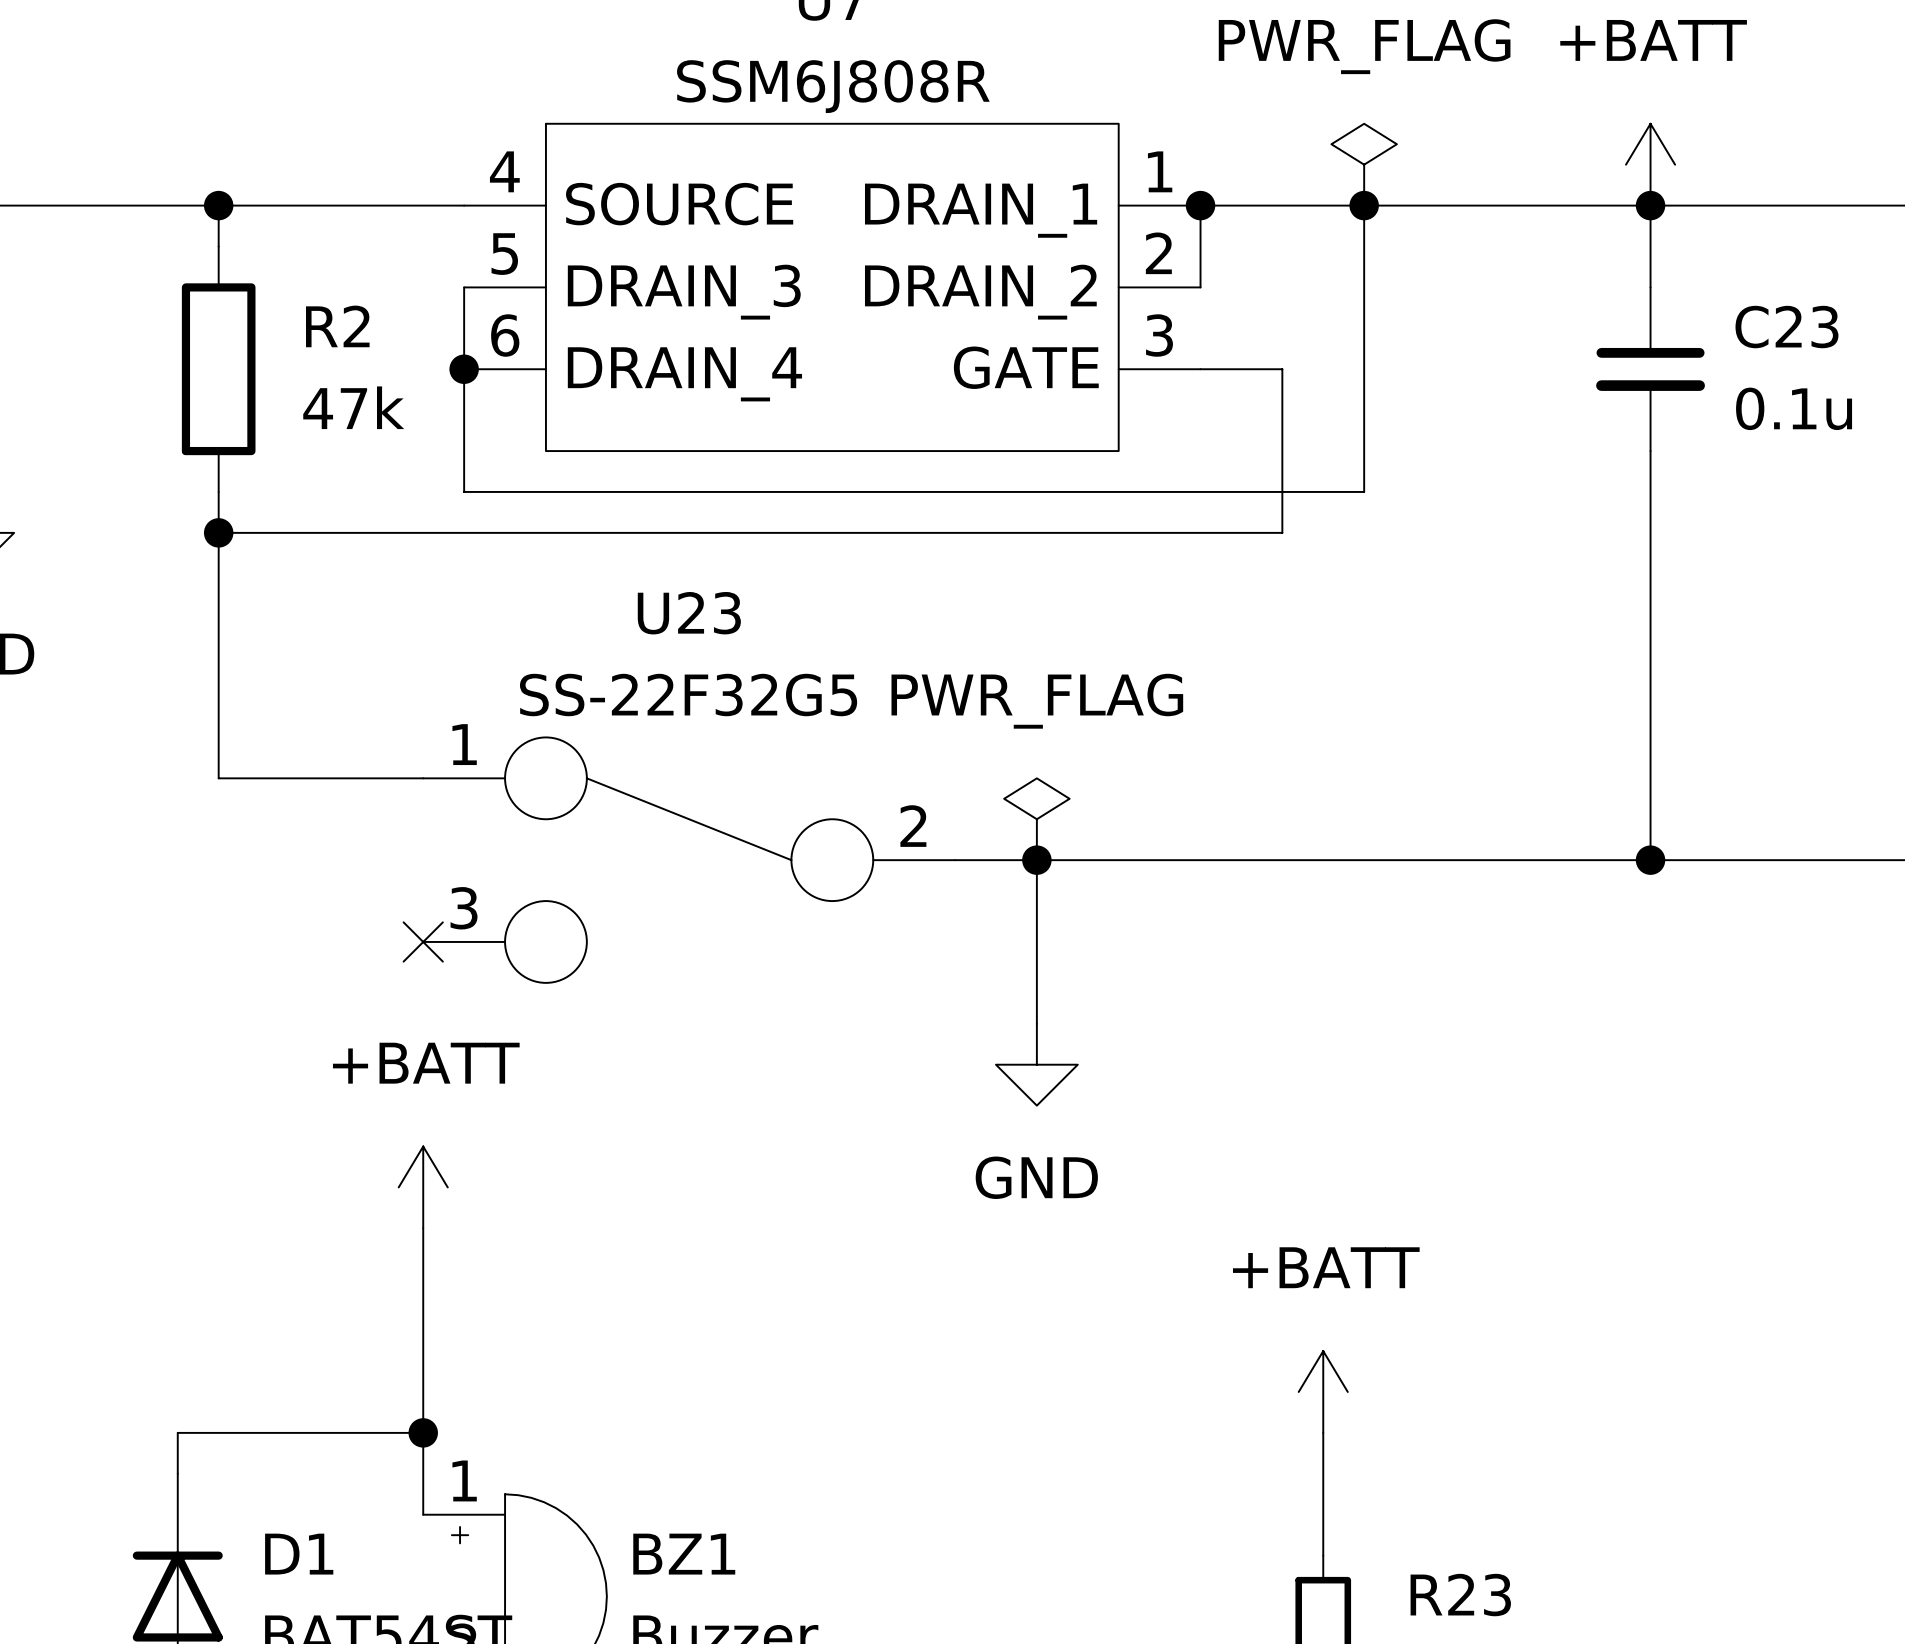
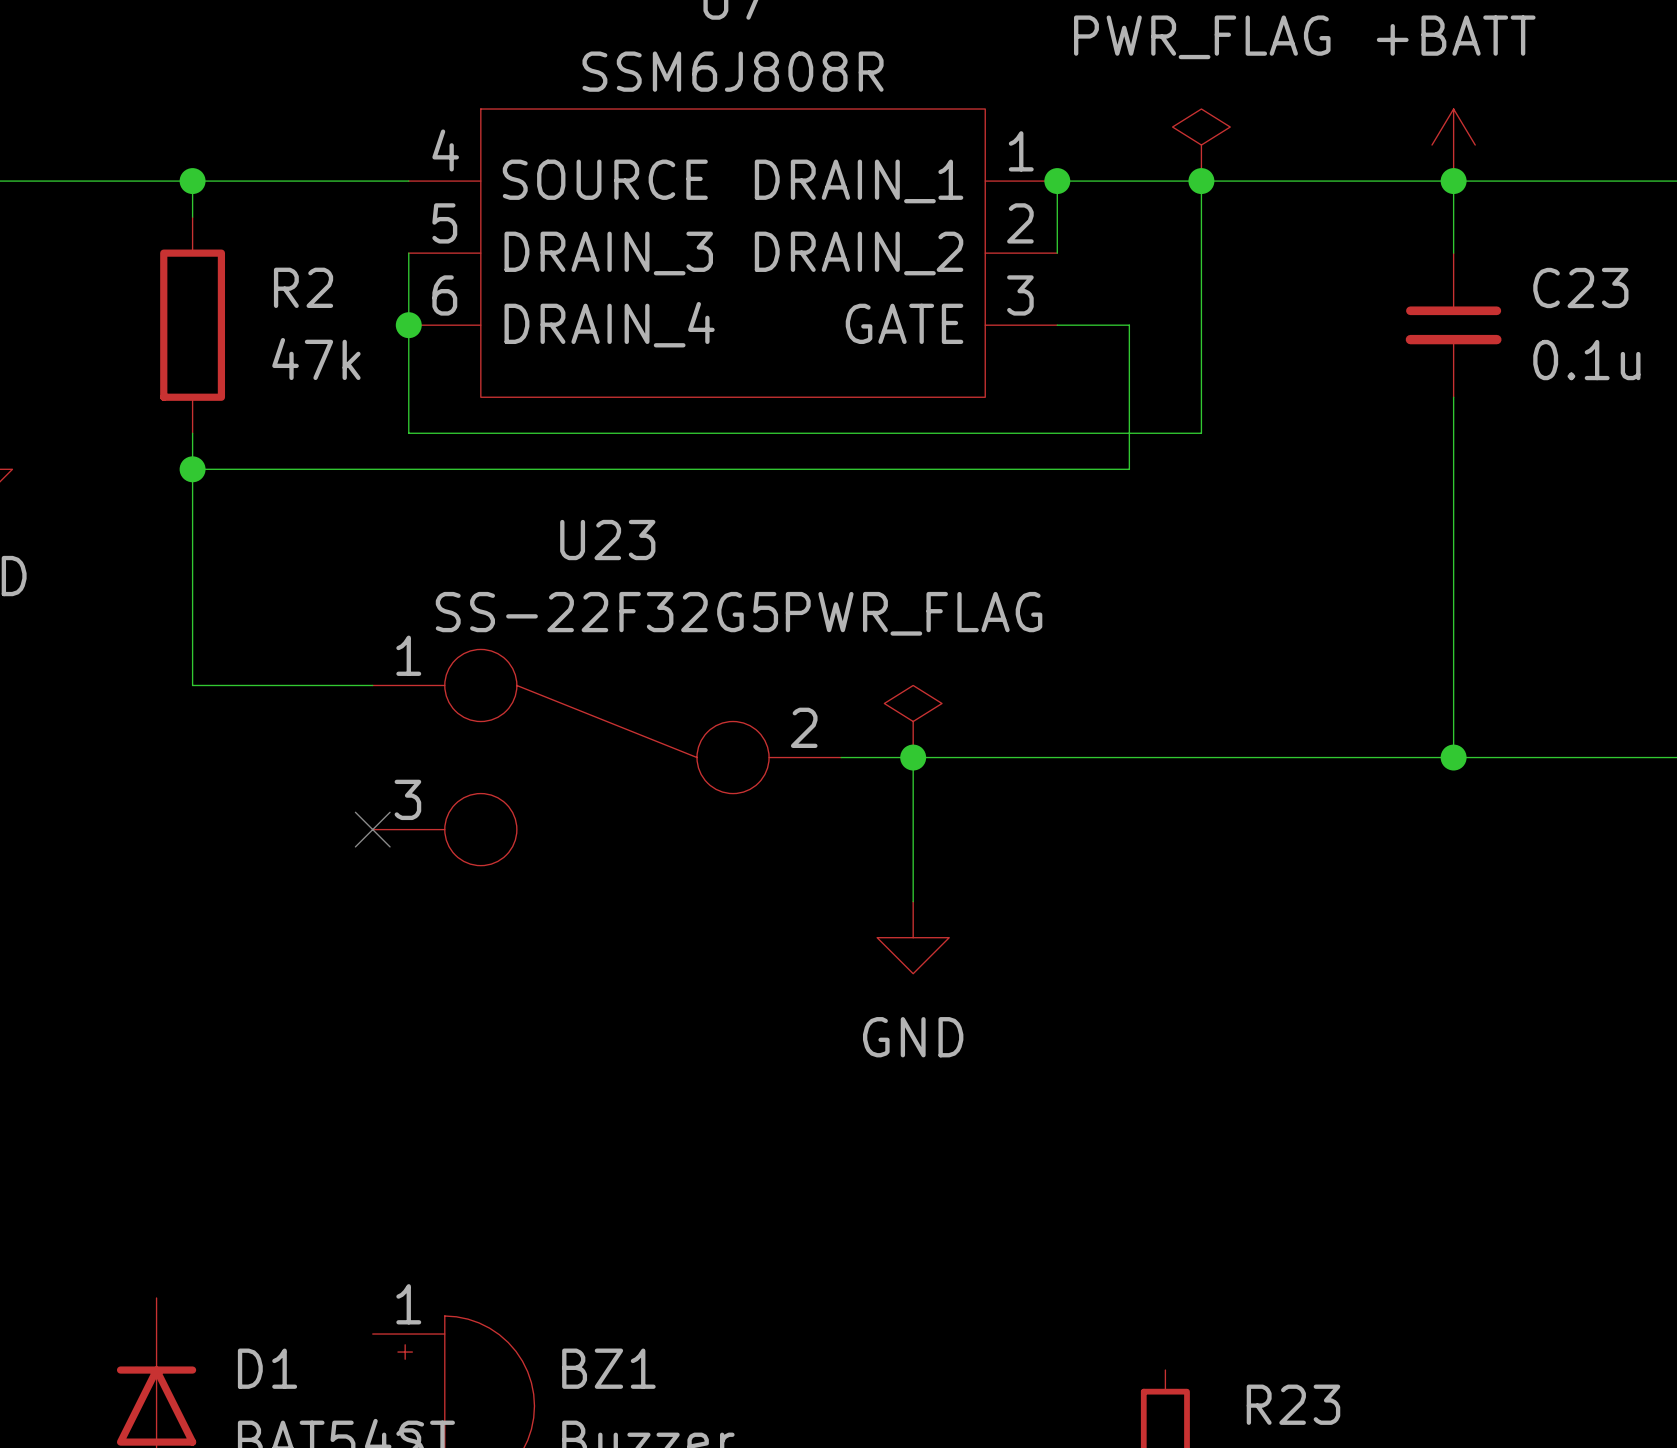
power symbol: +BATT (423, 1187) -> none
wire: (423, 1228) (423, 1514) -> none
power symbol: +BATT (1323, 1391) -> none
wire: (423, 1432) (177, 1432) (177, 1473) -> none
junction: (423, 1432) -> none
wire: (1323, 1432) (1323, 1555) -> none

